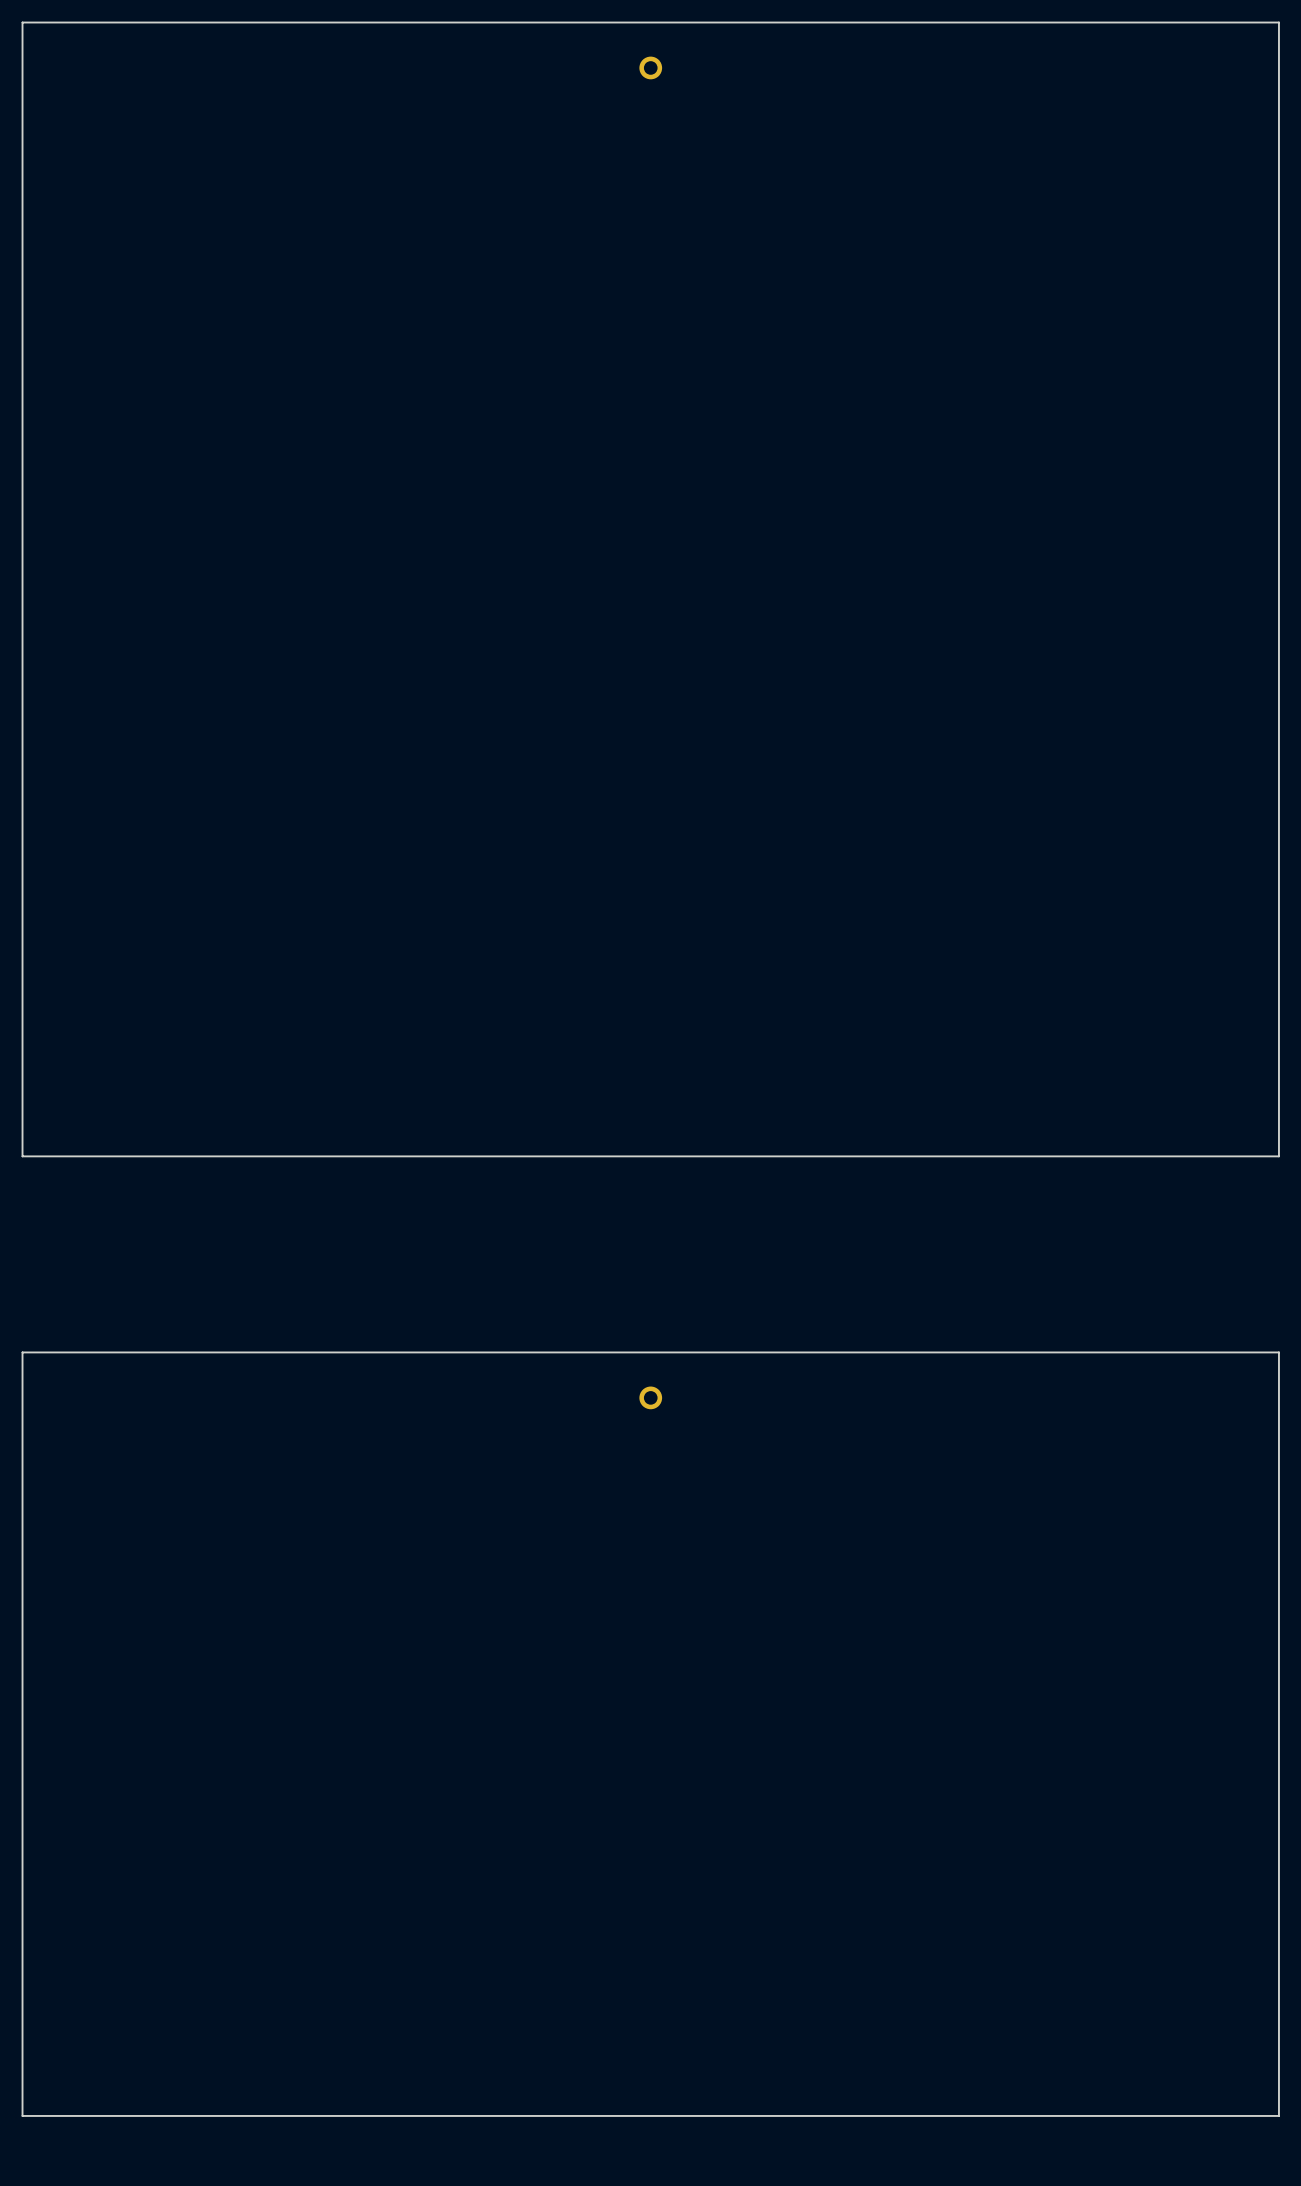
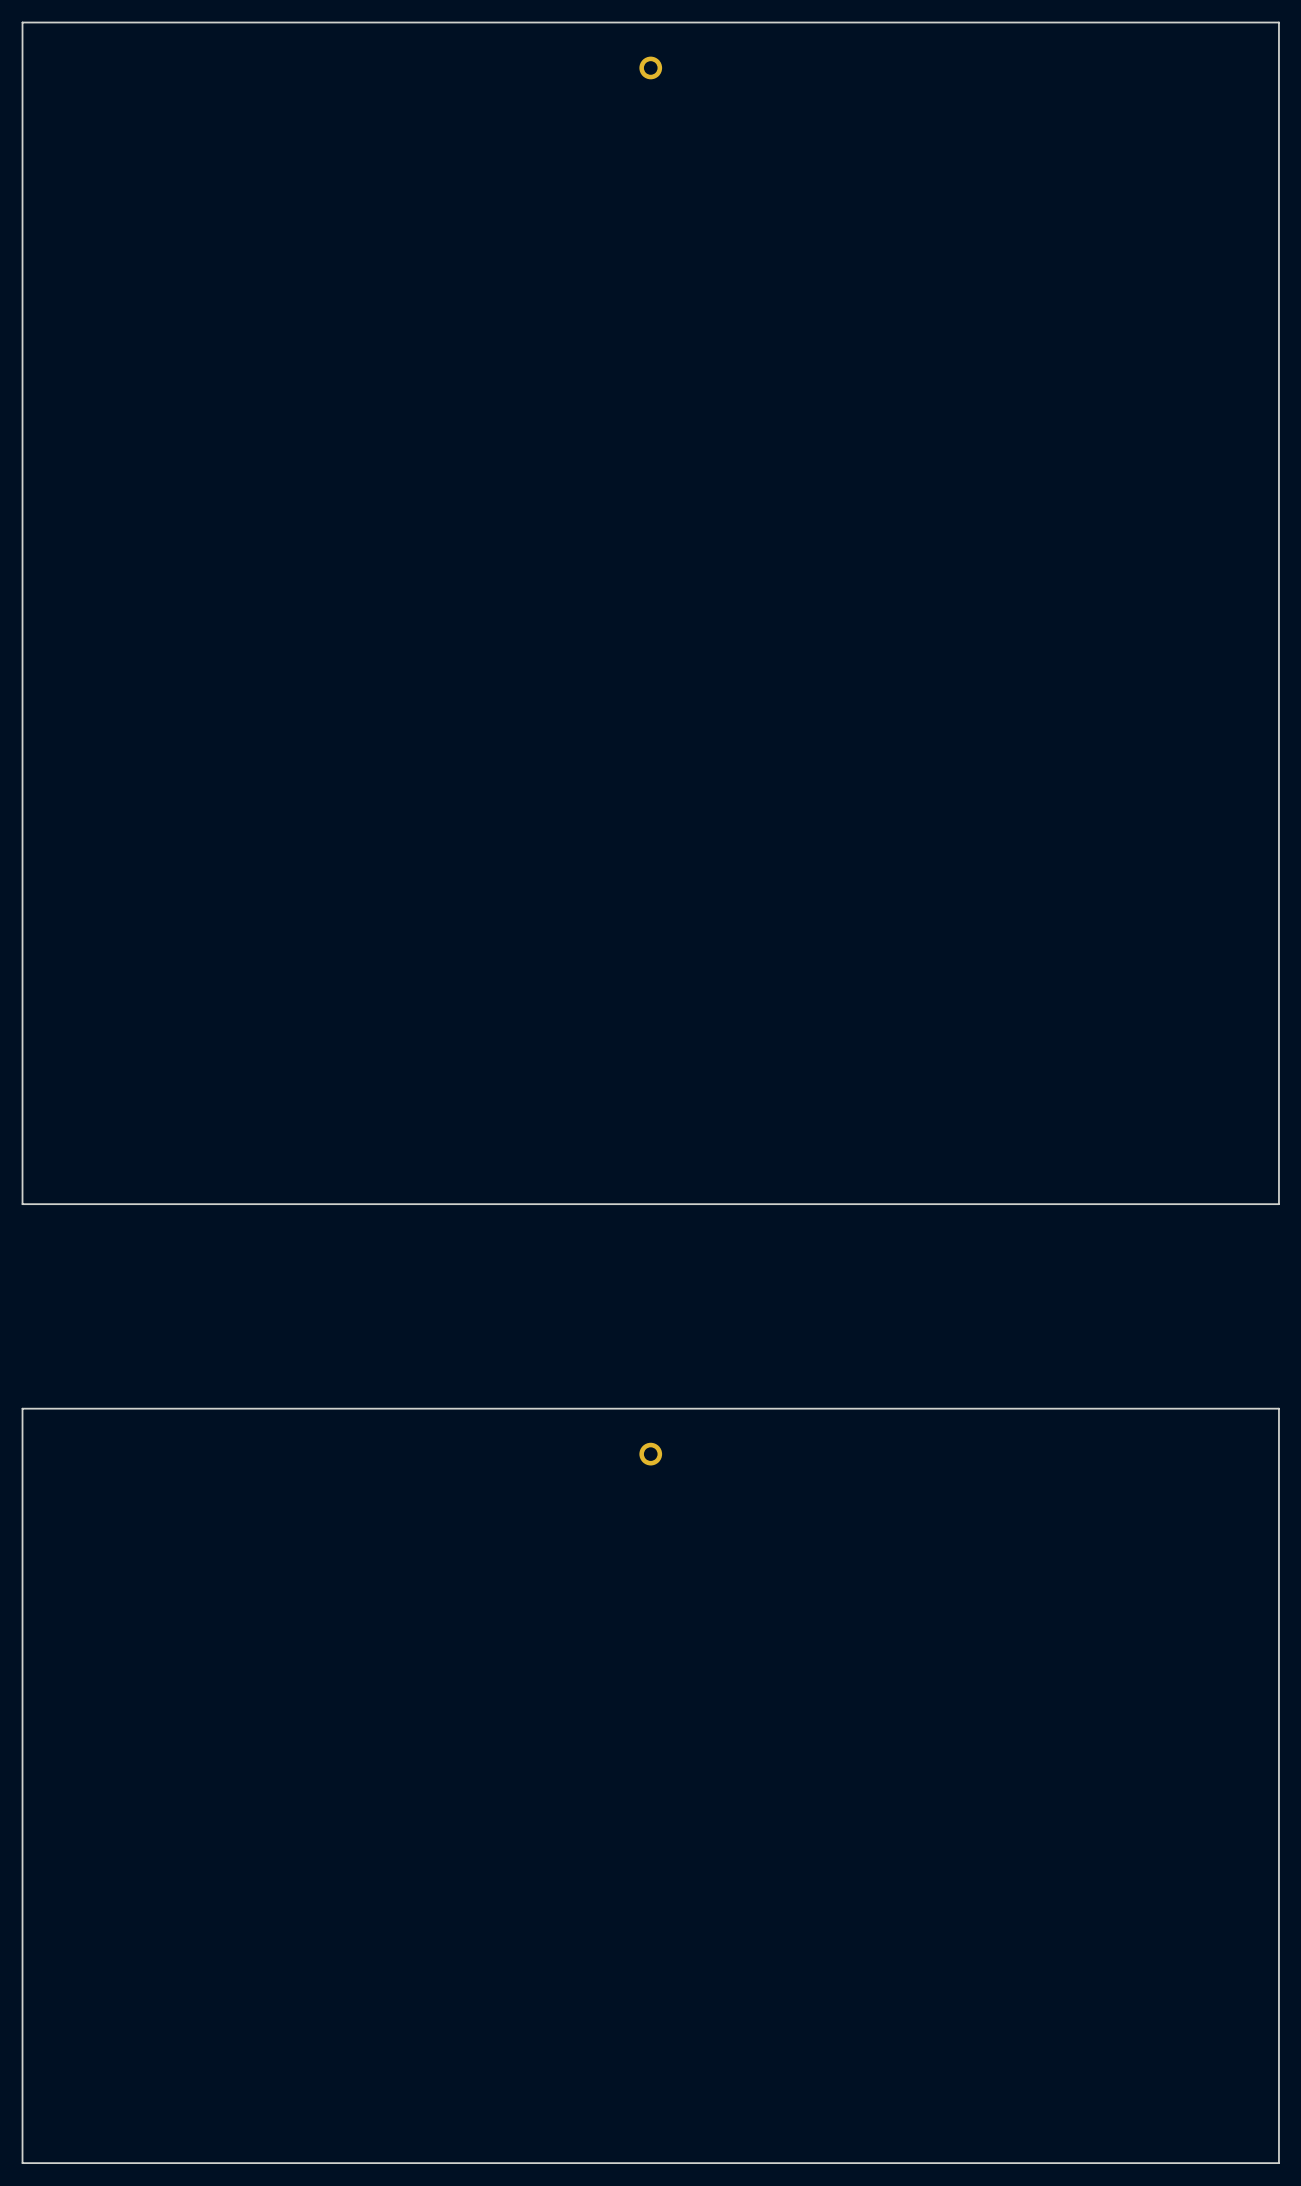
board edge: (1278, 1156) (22, 1156) -> (1278, 1156) (1278, 1204) (22, 1204) (22, 1156)
part position: (650, 1397) -> (650, 1454)
board edge: (1278, 1408) (1278, 1352) (22, 1352) (22, 1408) -> (1278, 1408) (22, 1408)
board edge: (1278, 2115) (22, 2115) -> (1278, 2115) (1278, 2163) (22, 2163) (22, 2115)

